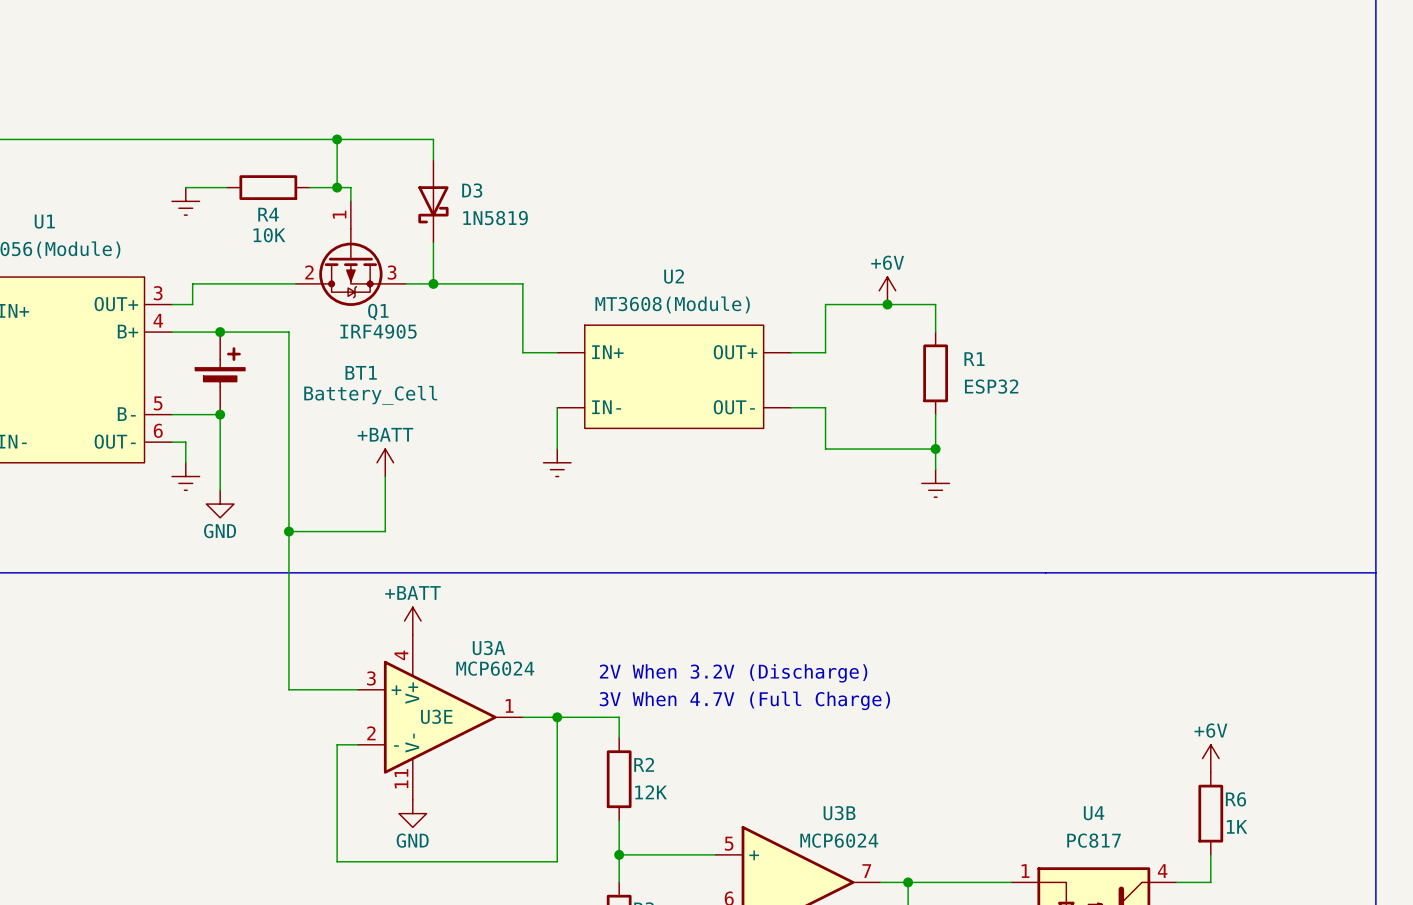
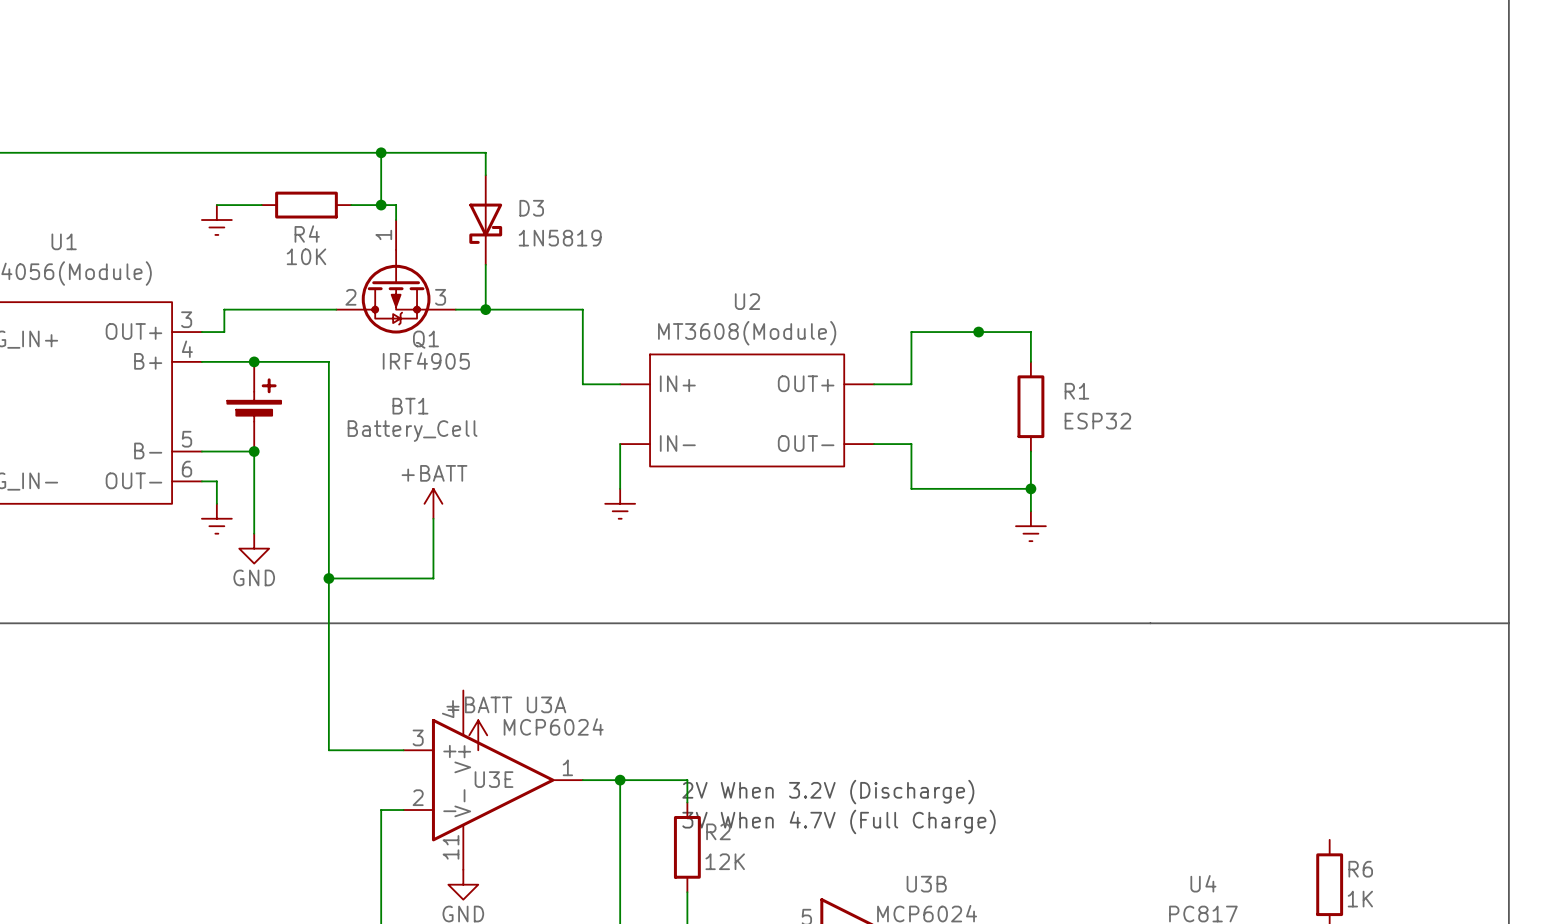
power symbol: +6V (887, 290) -> none
power symbol position: +BATT (412, 621) -> +BATT (478, 735)
text position: 2V When 3.2V (Discharge) (733, 673) -> 2V When 3.2V (Discharge) (828, 792)
text position: 3V When 4.7V (Full Charge) (744, 700) -> 3V When 4.7V (Full Charge) (838, 821)
power symbol: +6V (1210, 758) -> none

